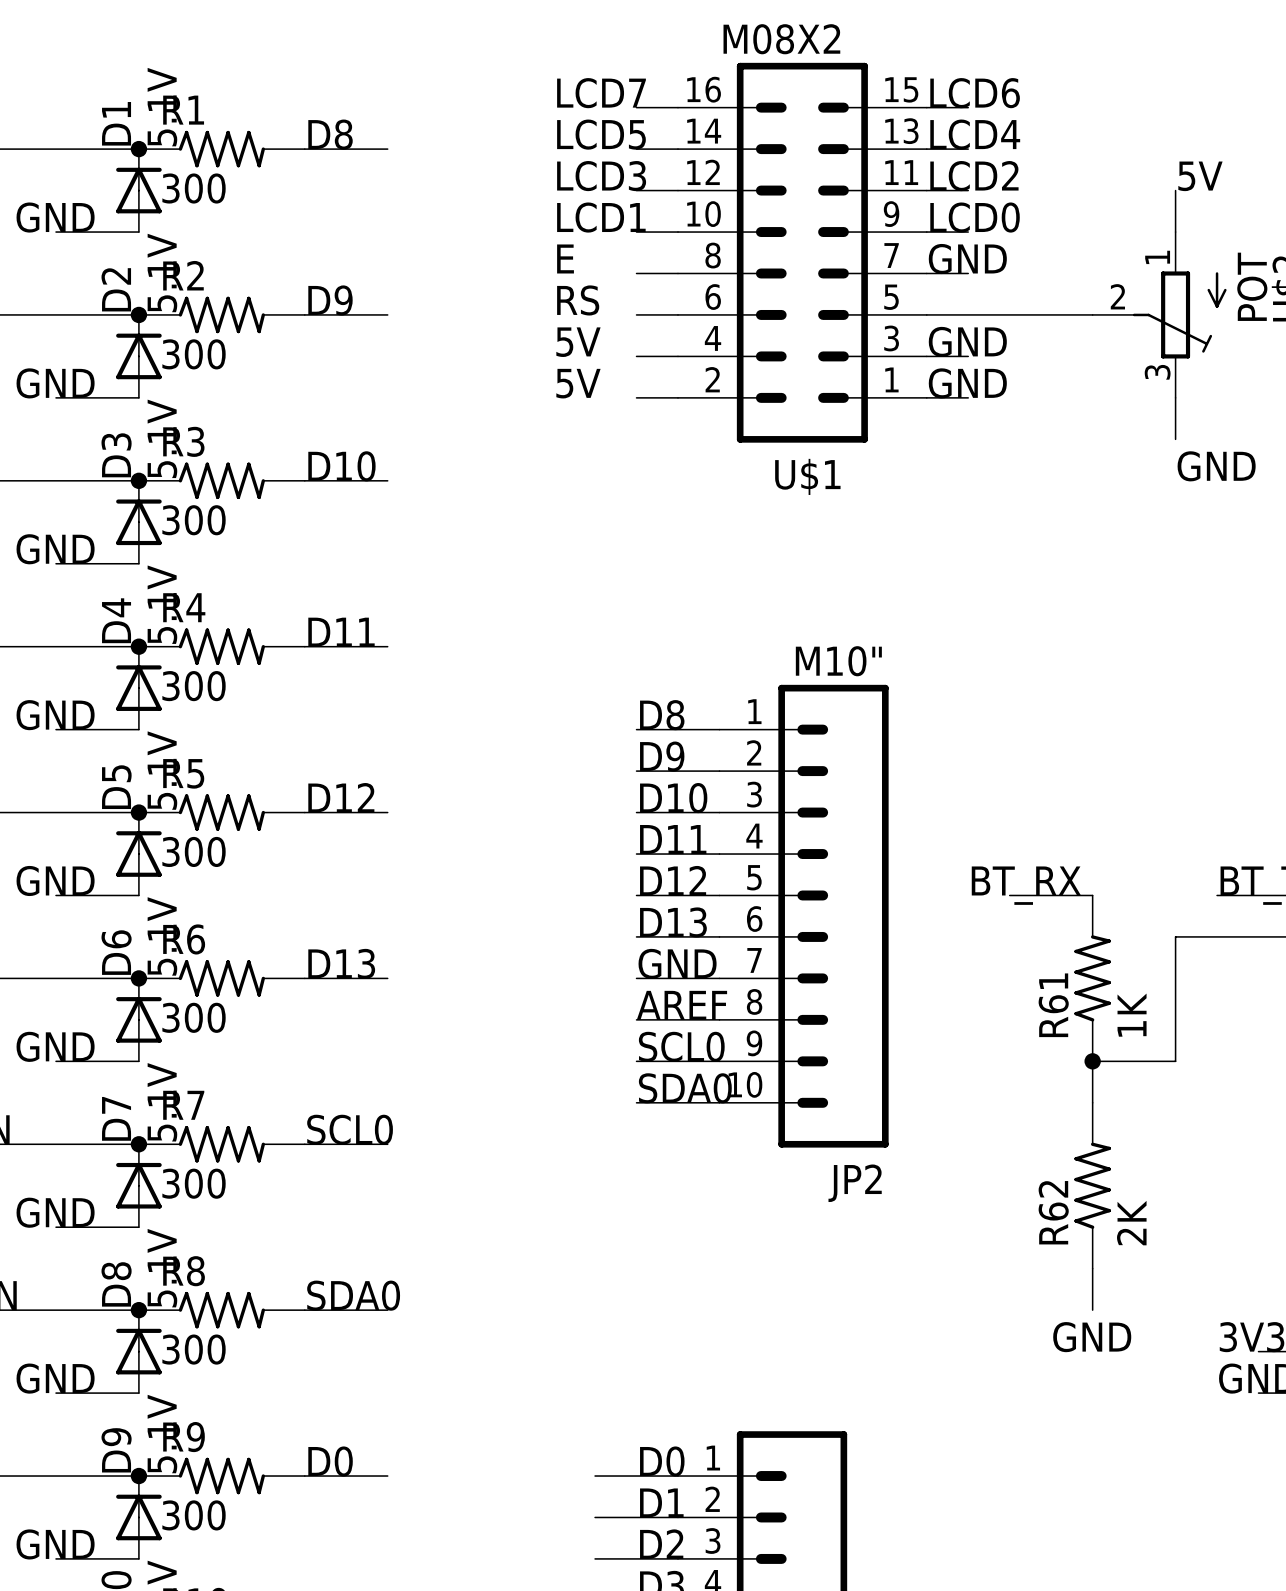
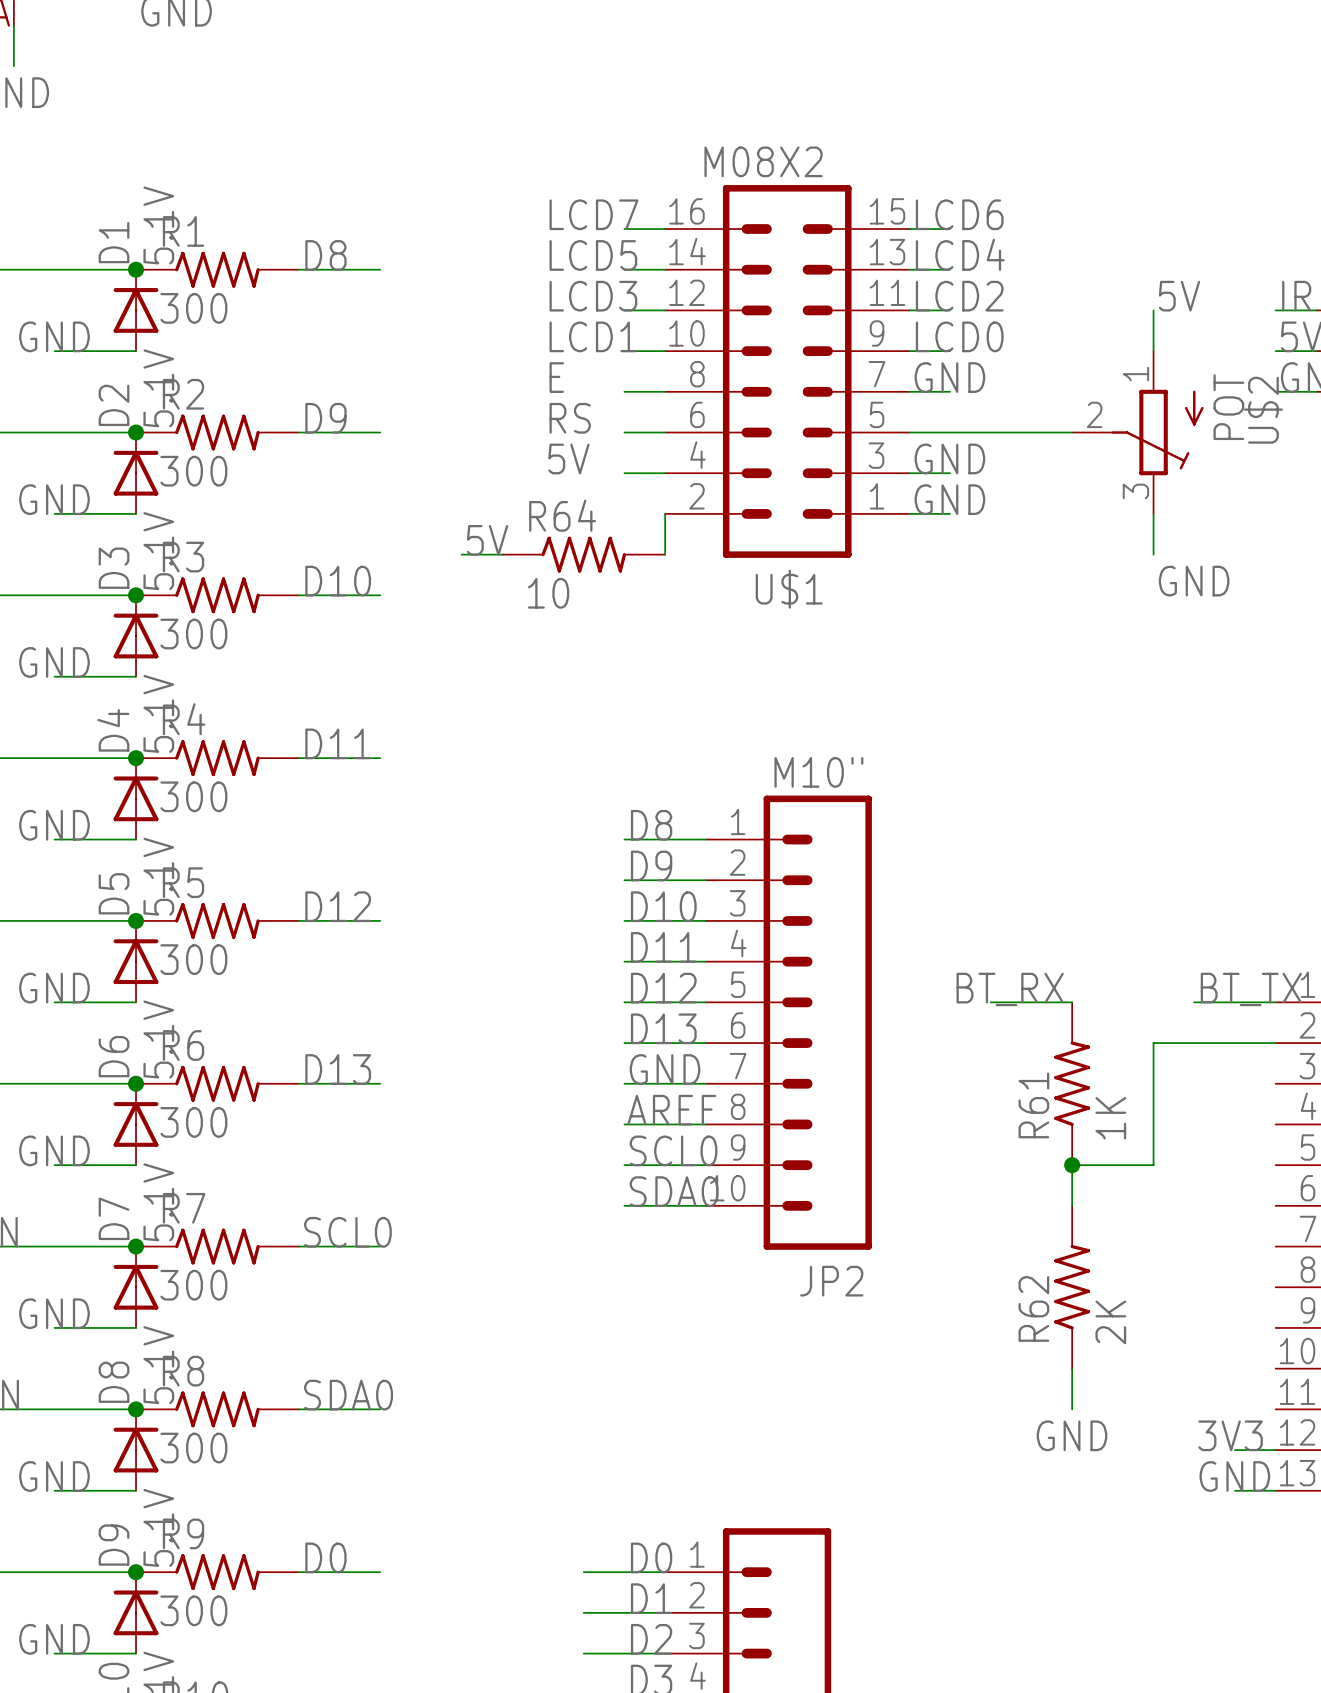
label position: 5V (578, 383) -> 5V (487, 540)
wire: (636, 397) (677, 397) -> (665, 554) (665, 513)
wire: none -> (461, 554) (502, 554)
R64: none -> 10 (583, 554)

